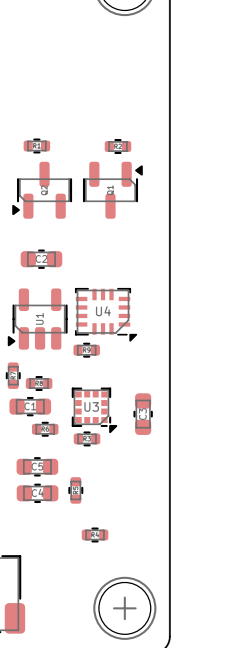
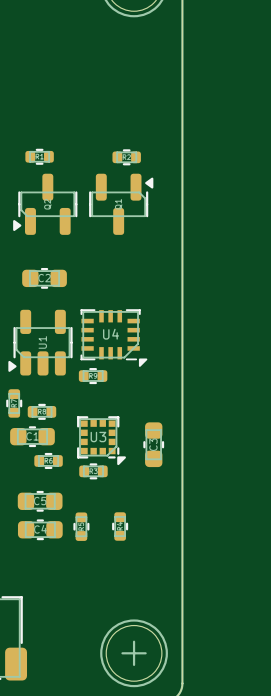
part rotation: 0° (95, 534) -> 90° clockwise (120, 526)
part position: (95, 534) -> (120, 526)

